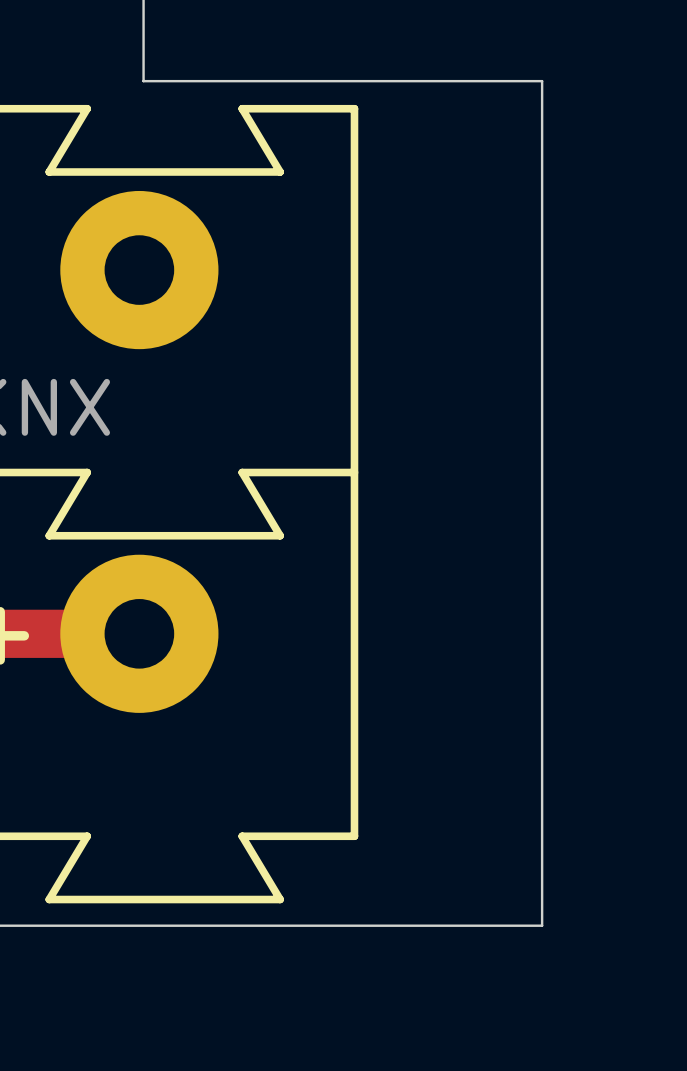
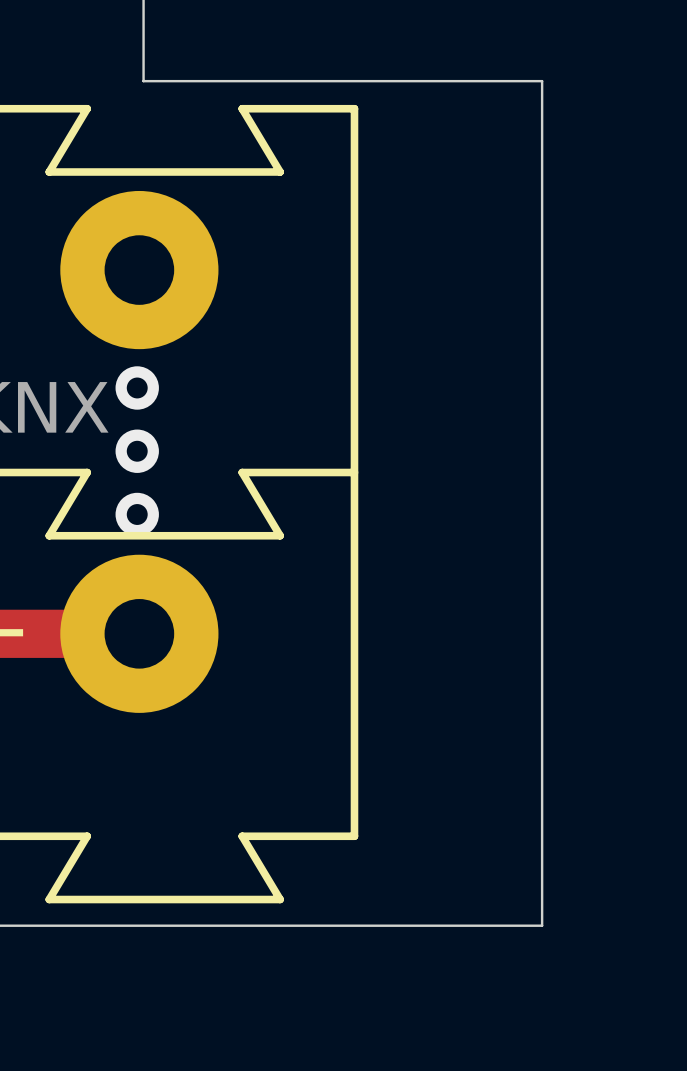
via: none -> (137, 387)
via: none -> (137, 451)
via: none -> (137, 514)

